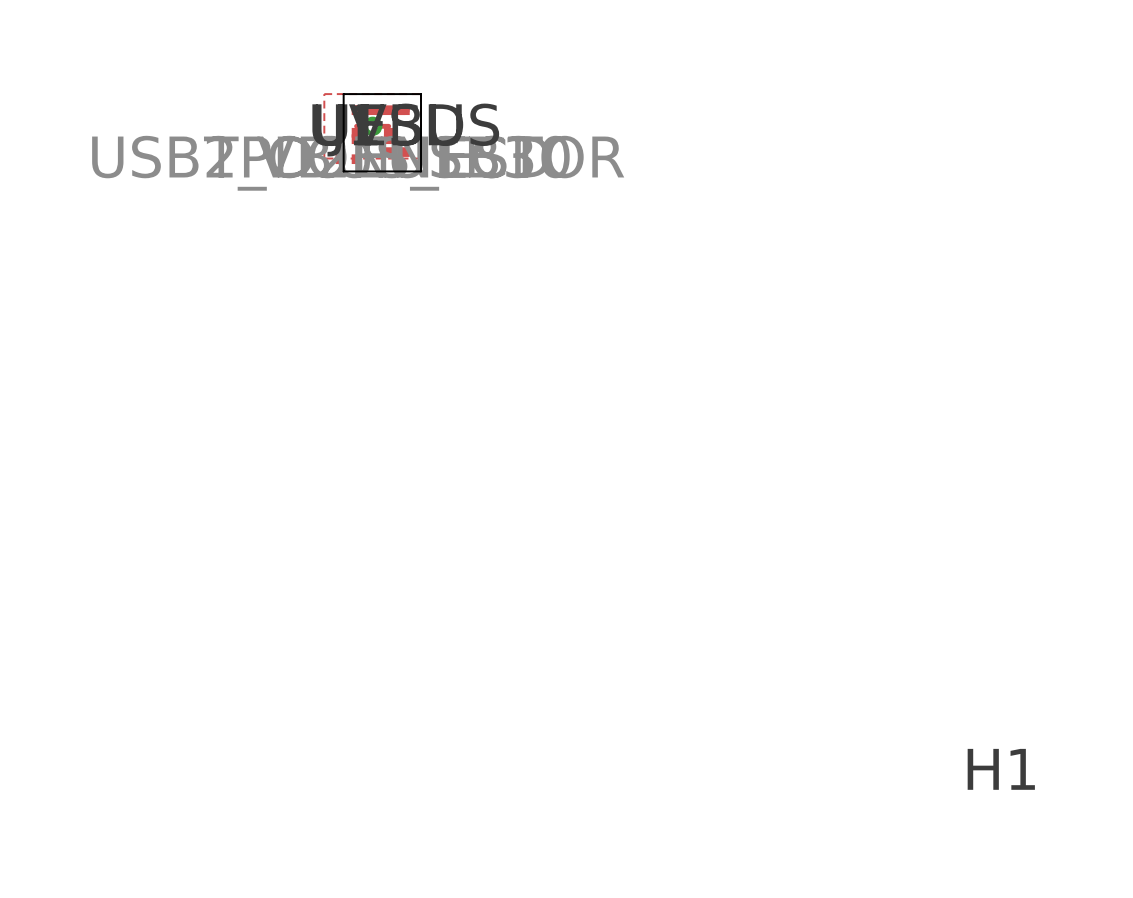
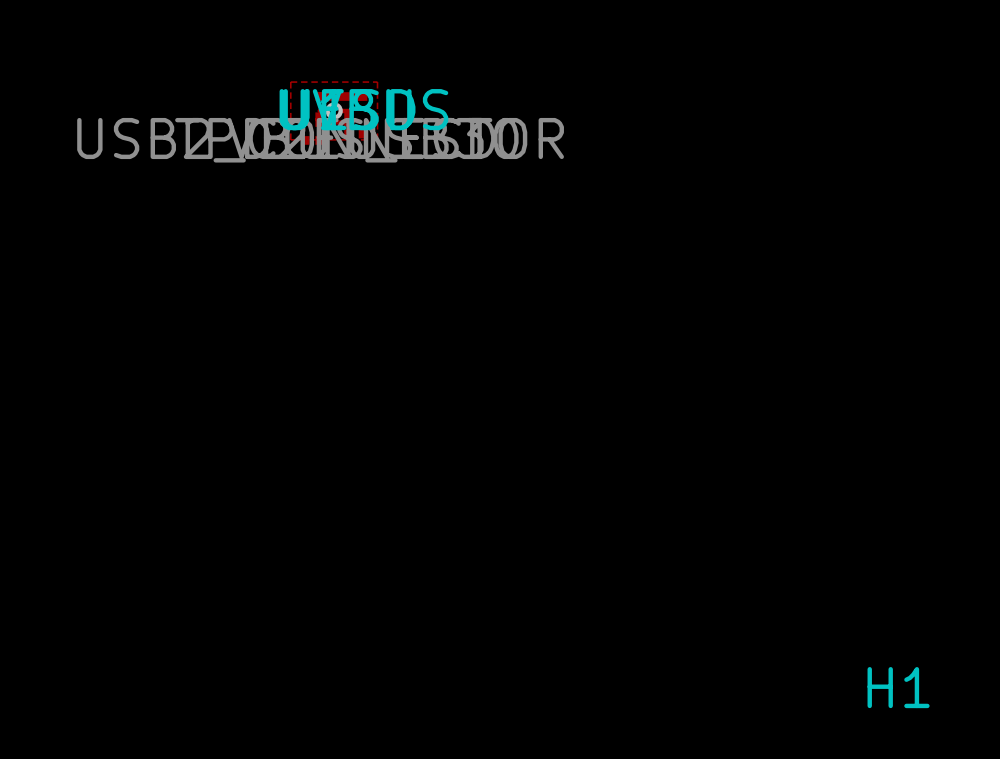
board edge: (343, 94) (421, 94) (421, 171) (343, 171) (343, 94) -> none

